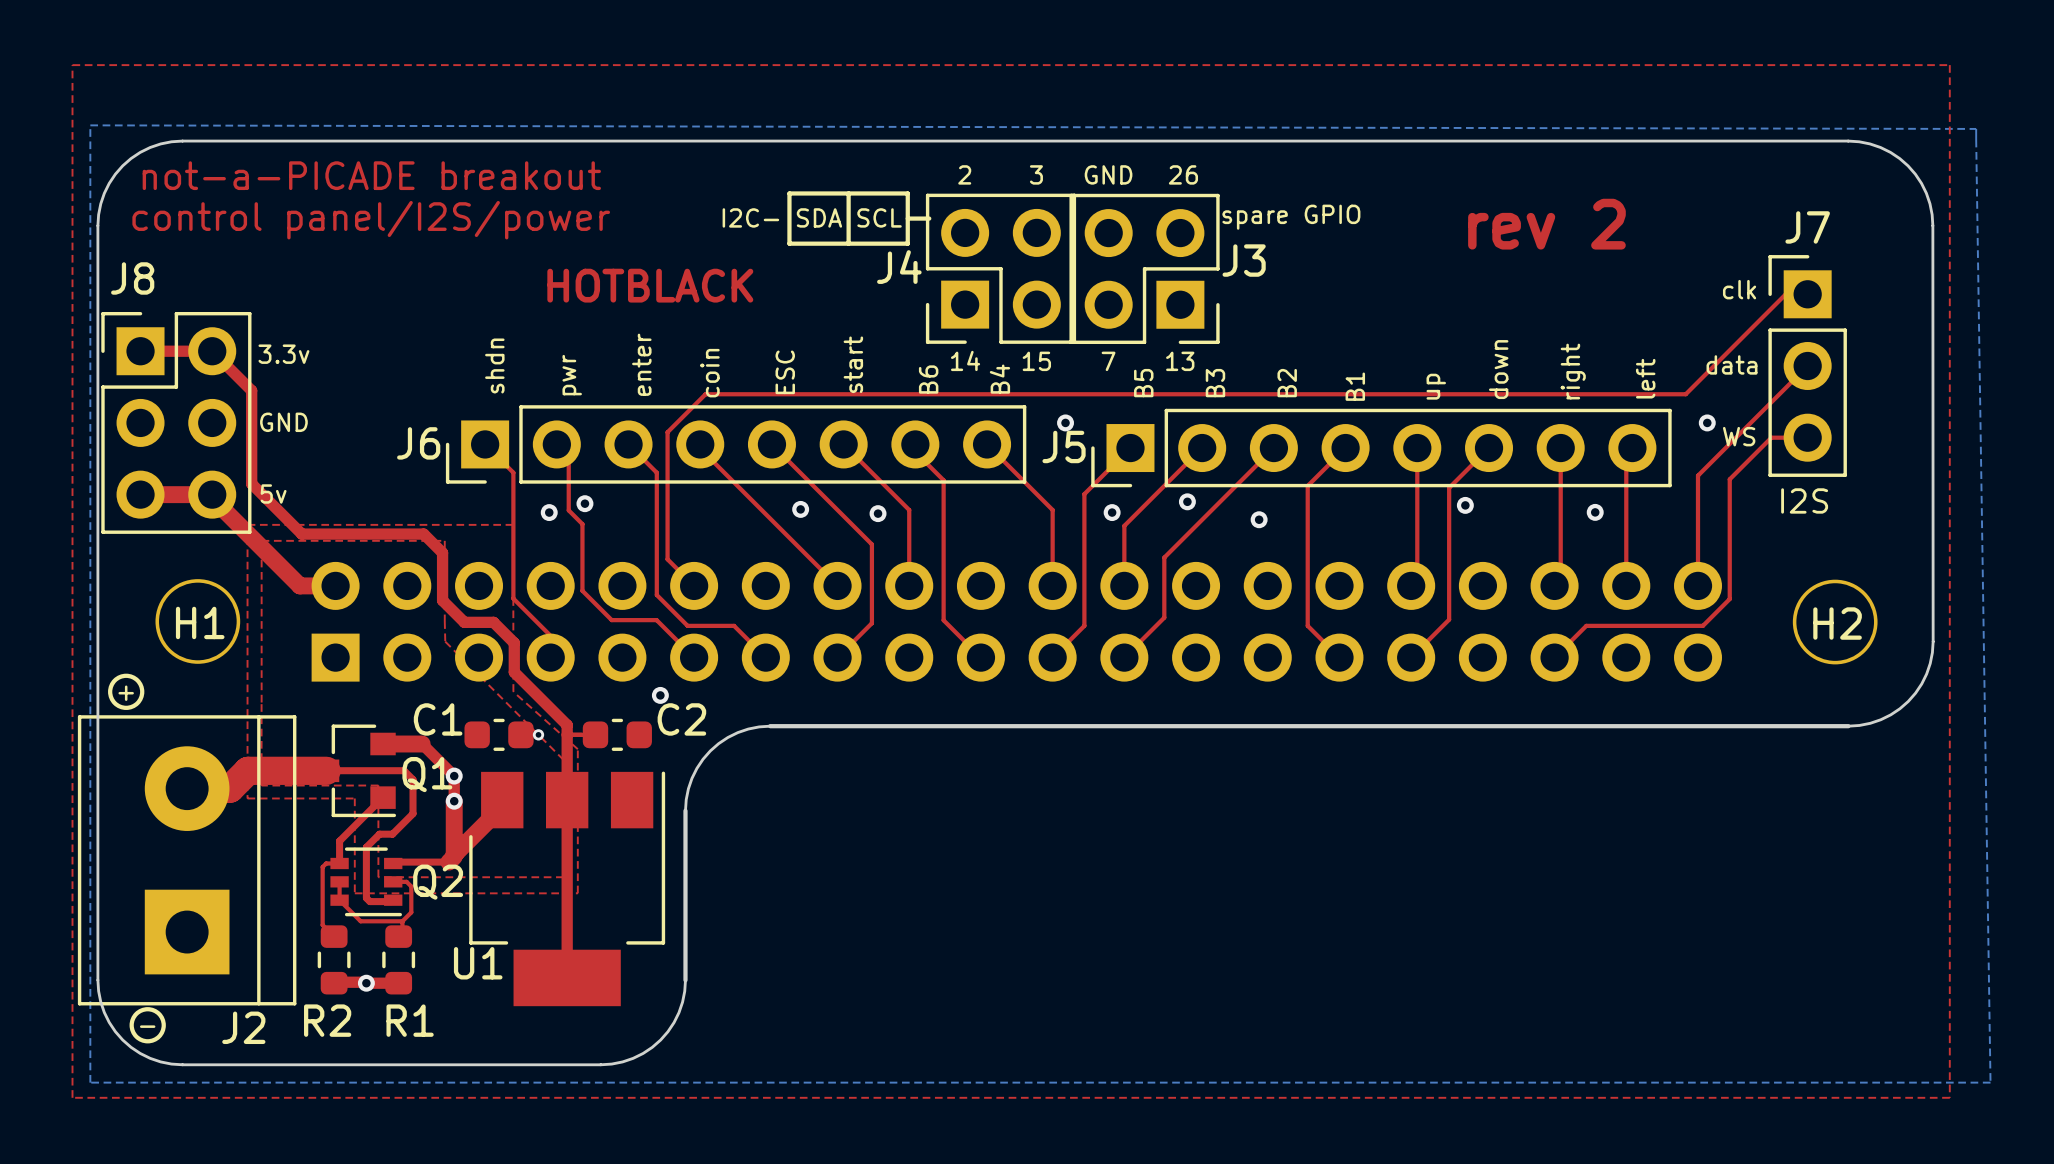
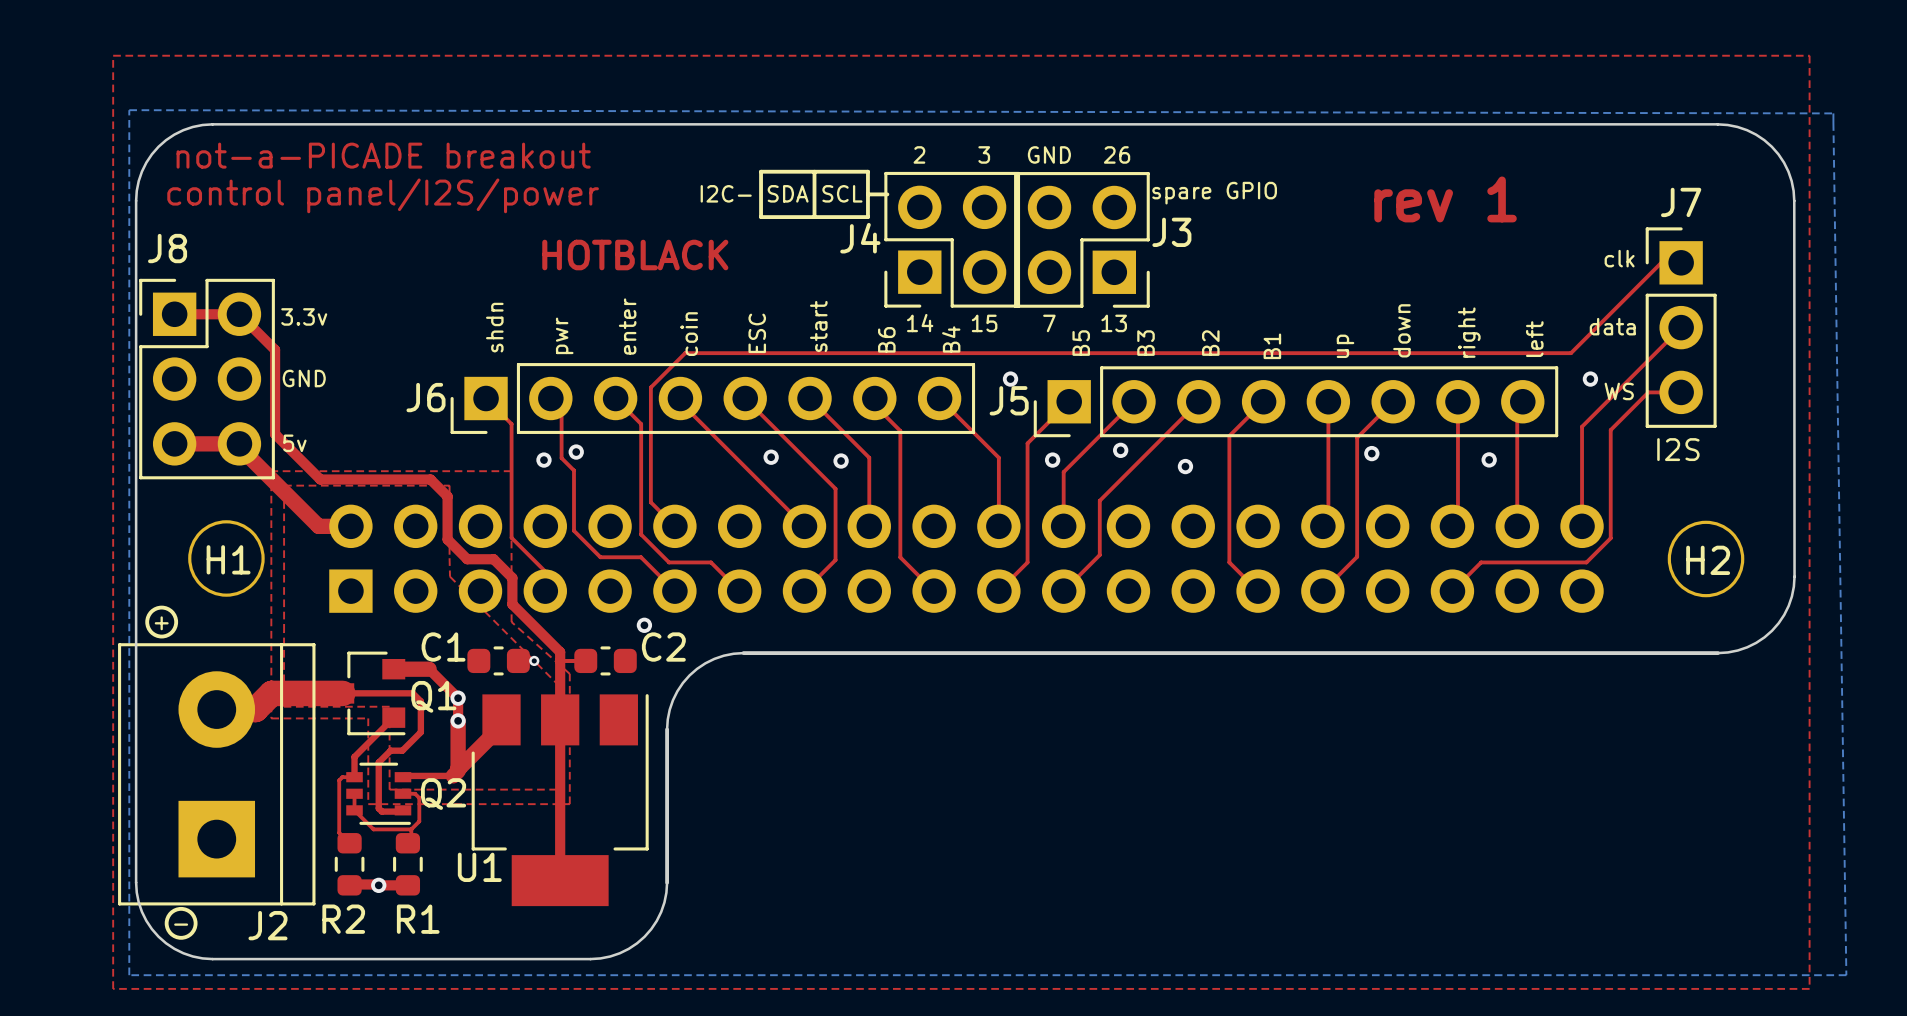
text: rev 2 (1546, 224) -> rev 1 (1445, 199)

